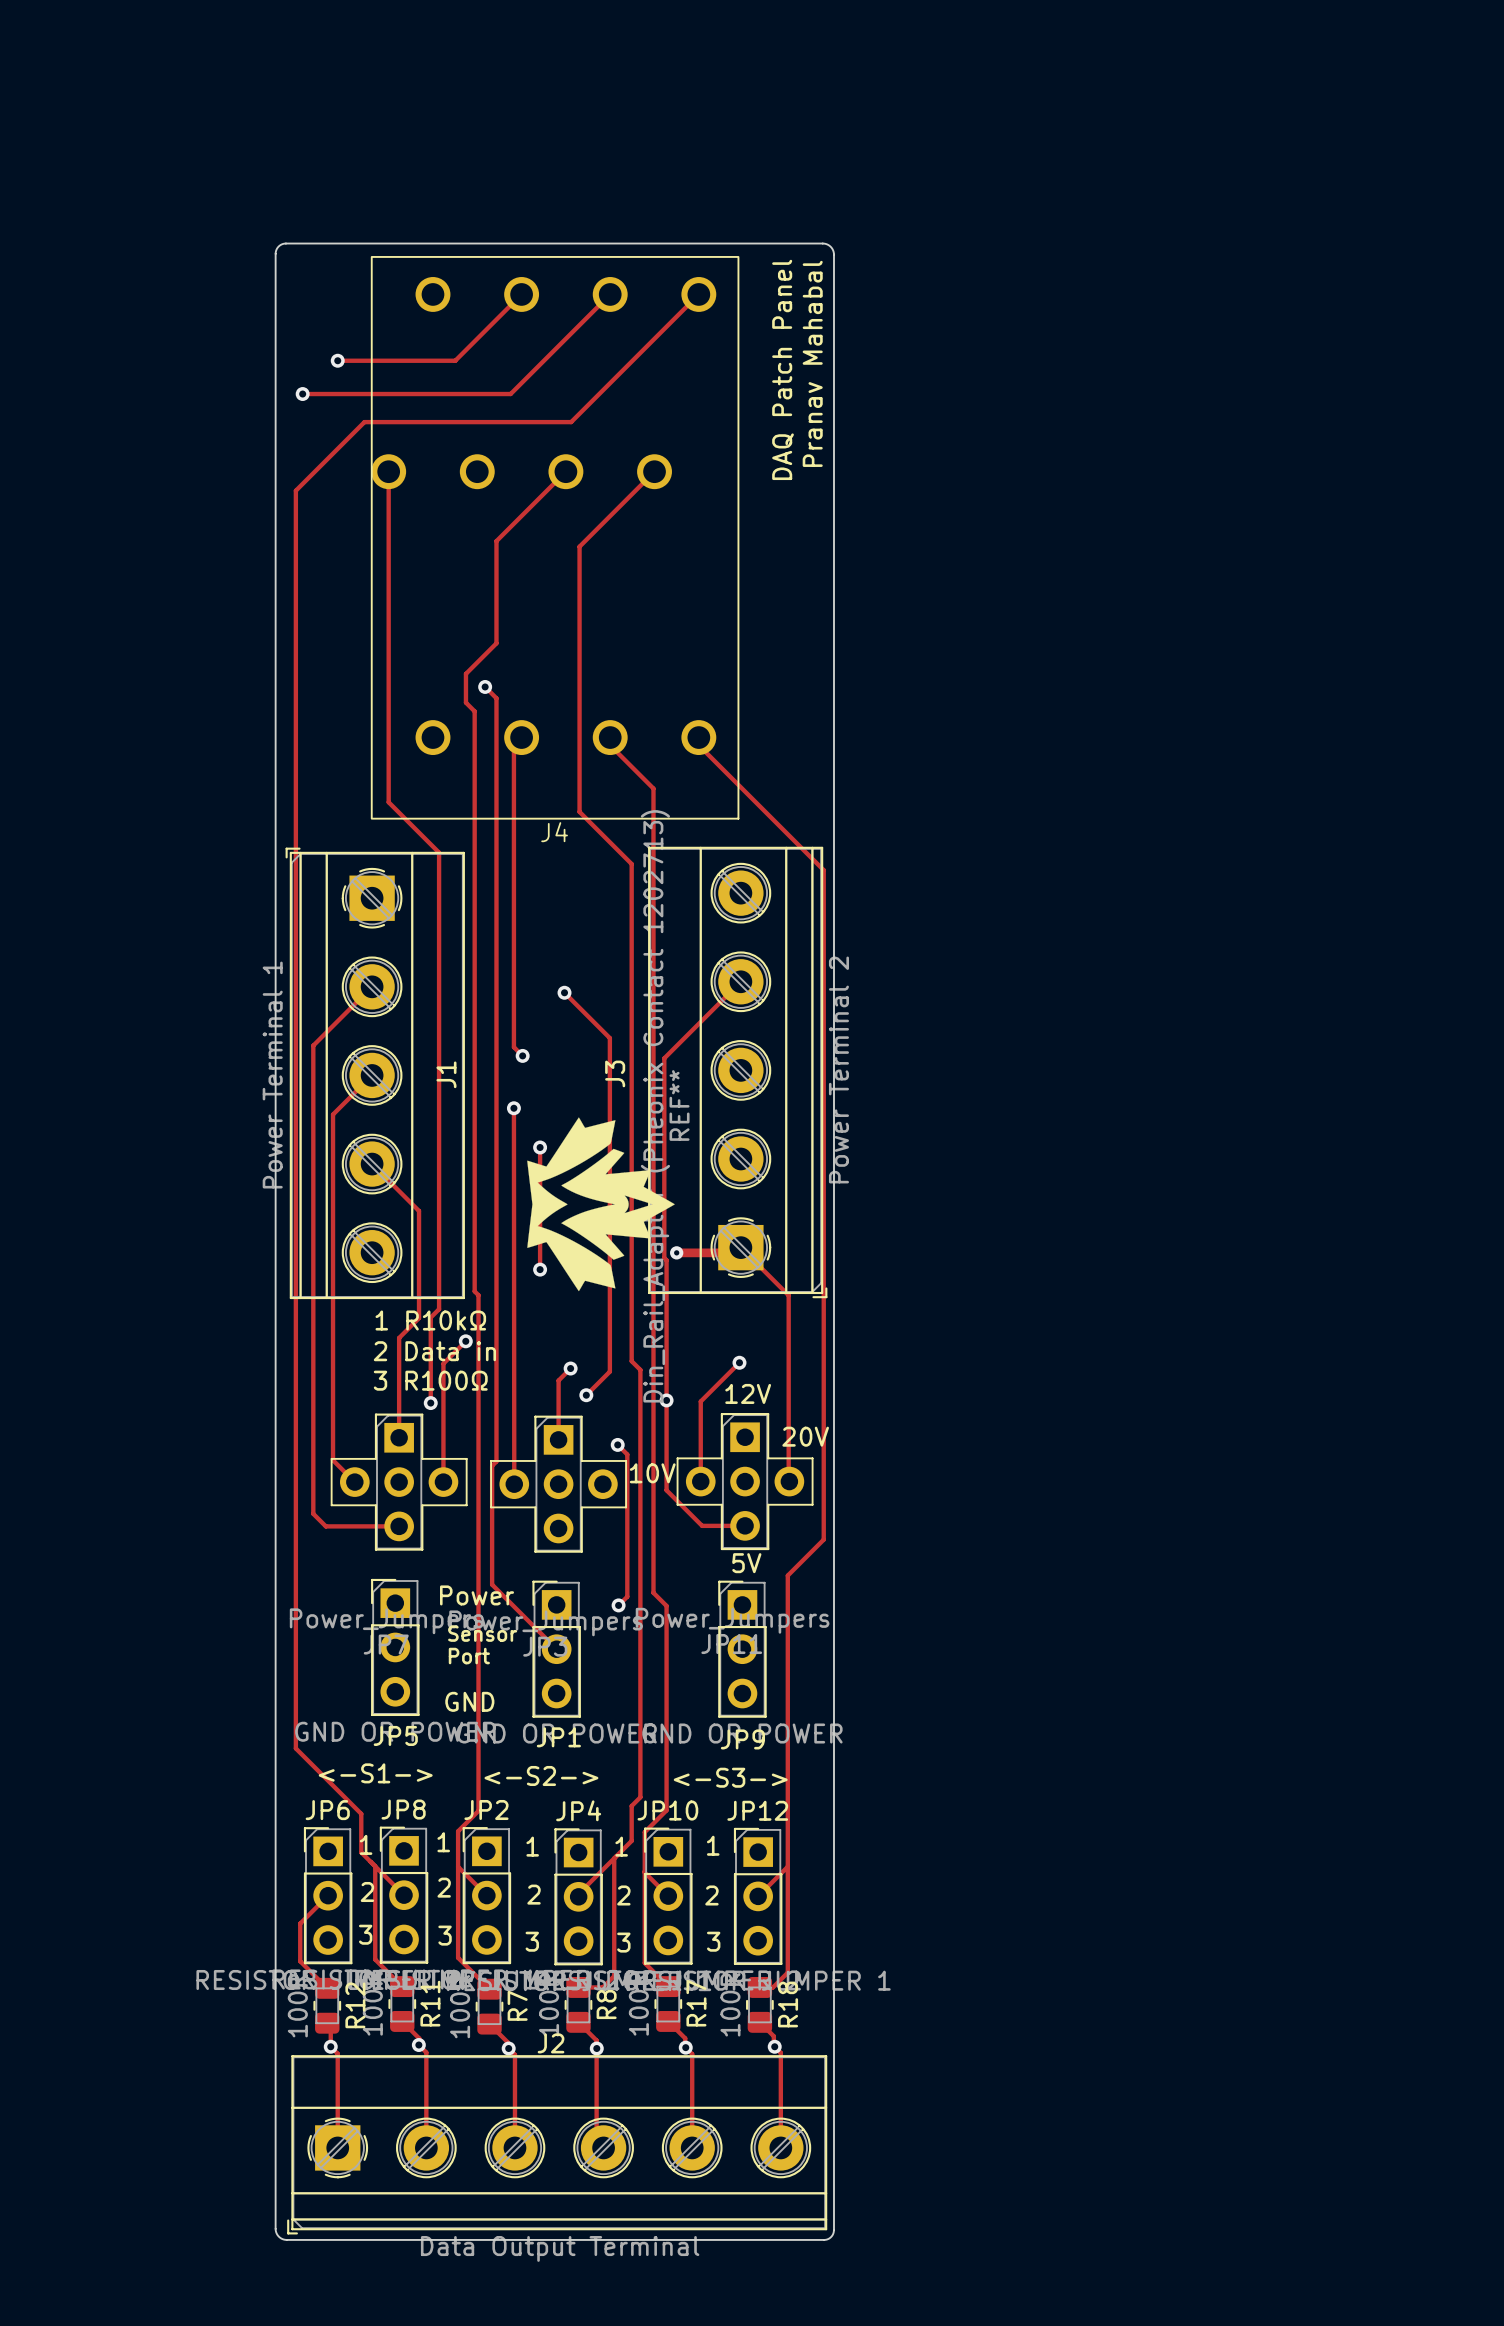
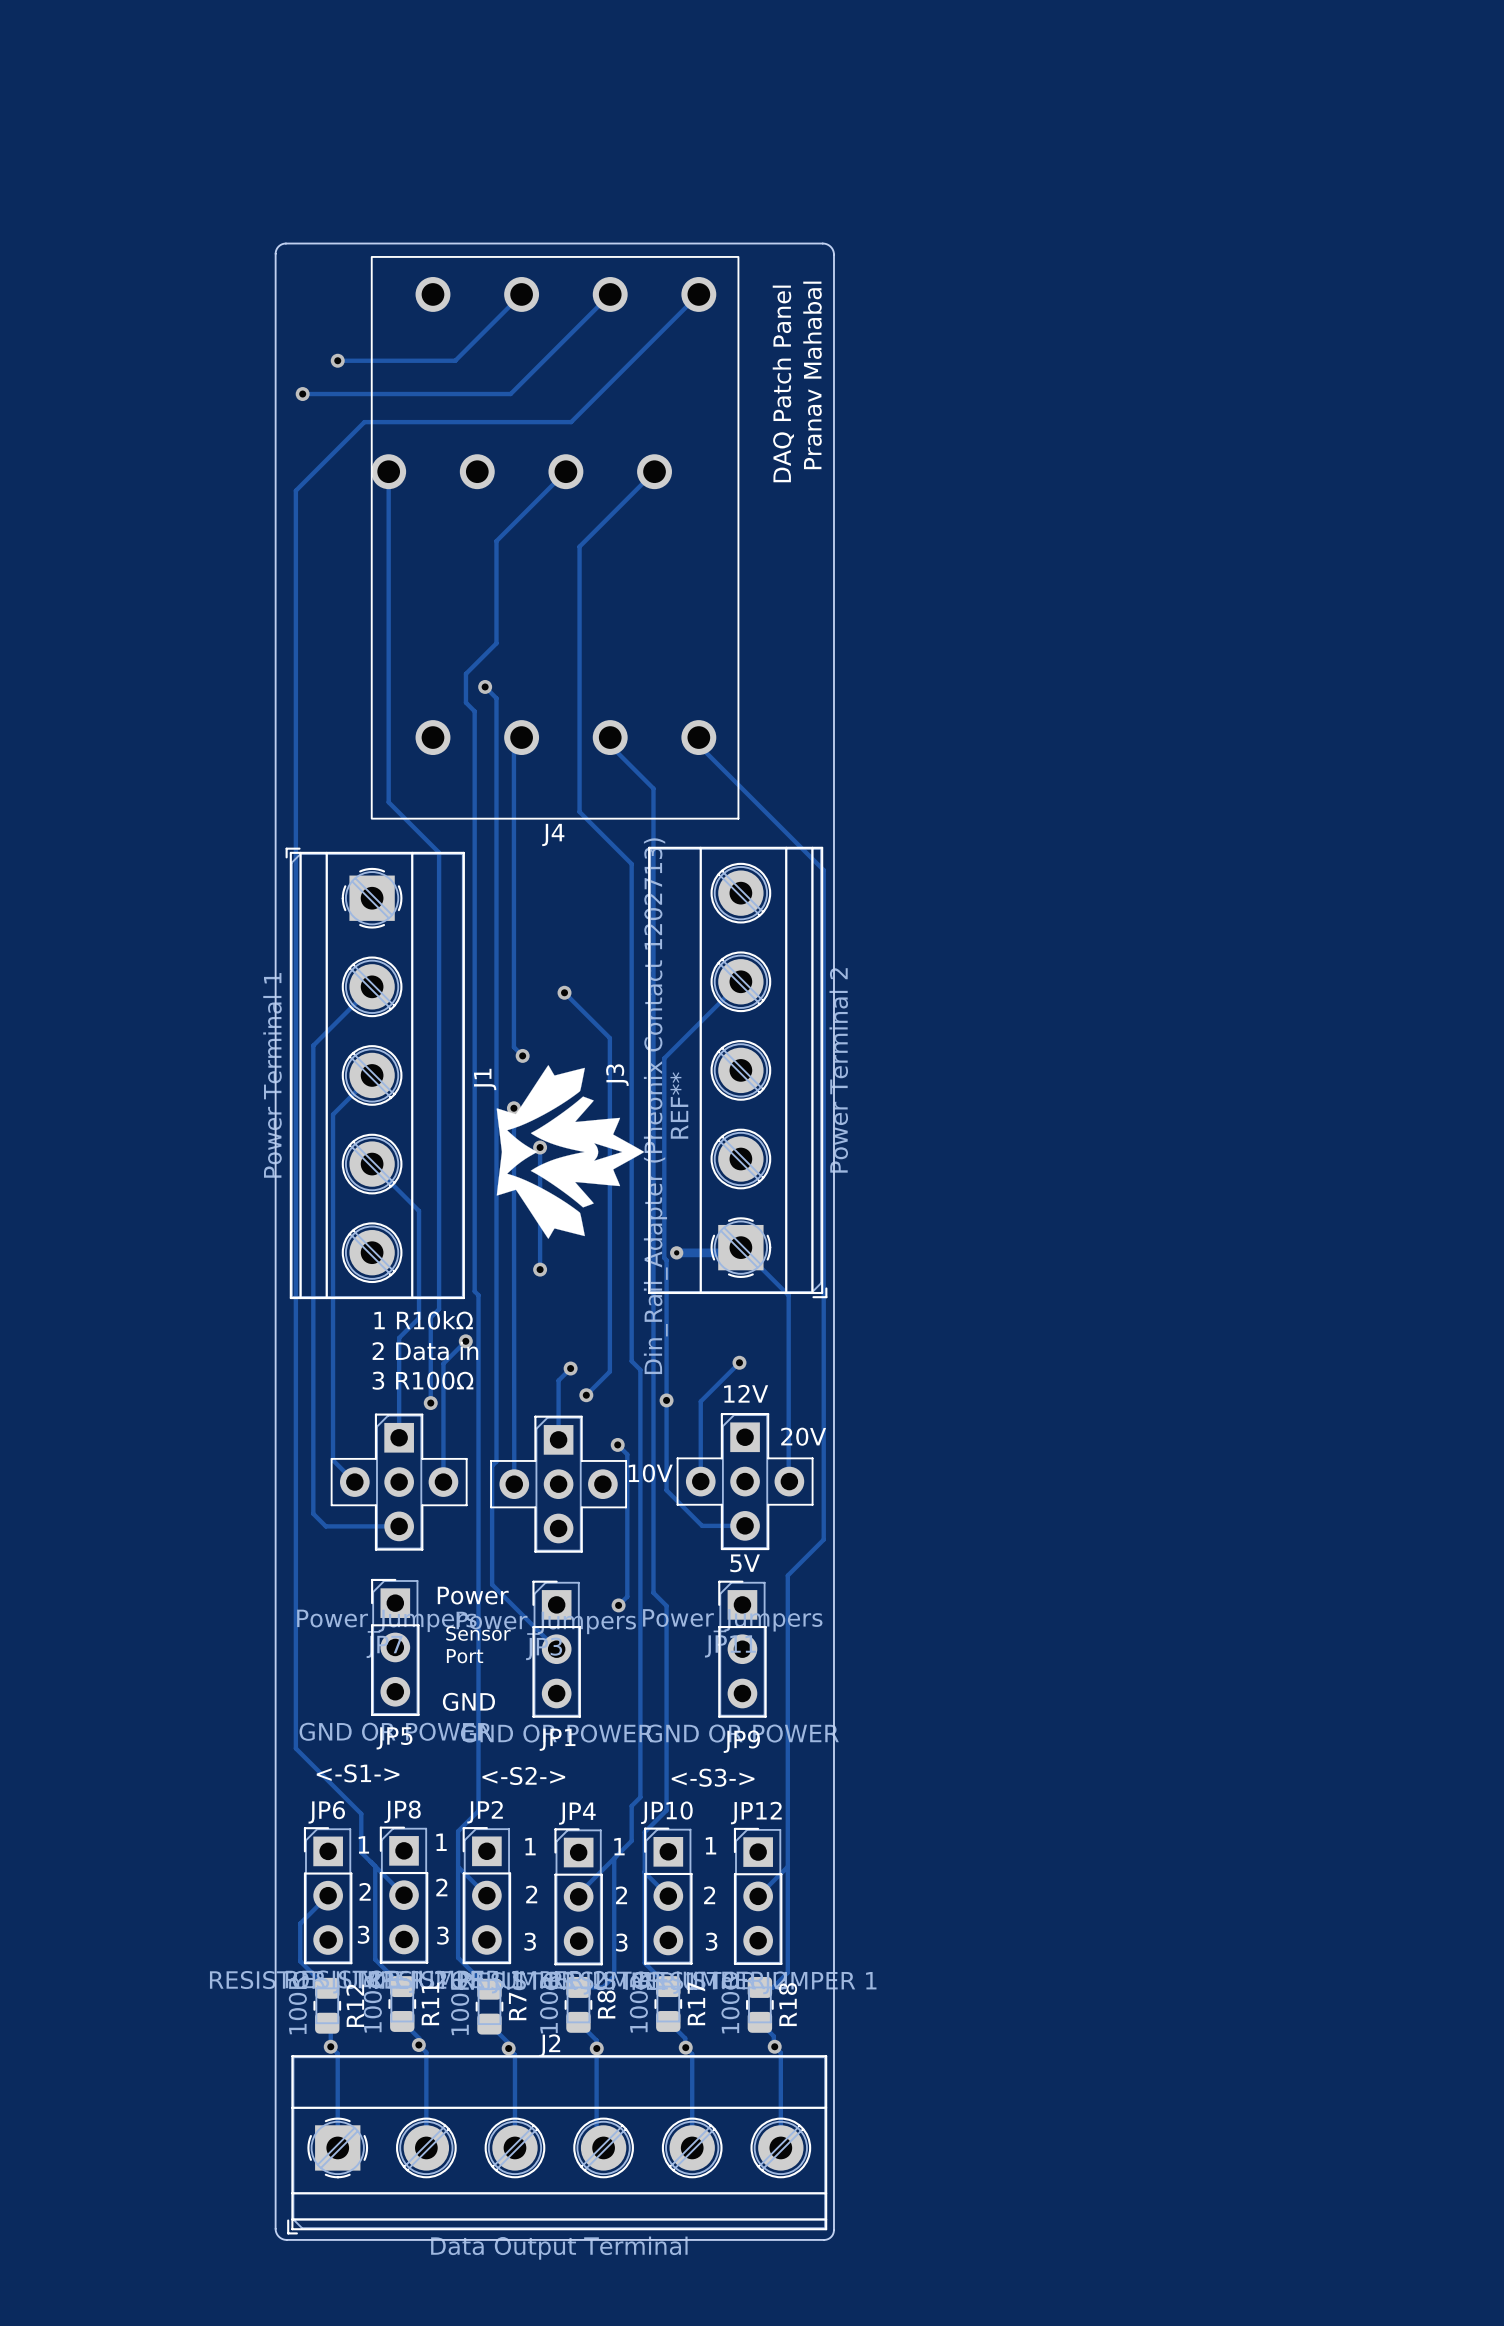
J1 name position: J1 (446, 1074) -> J1 (485, 1079)
drawing position: (601, 1204) -> (570, 1151)

